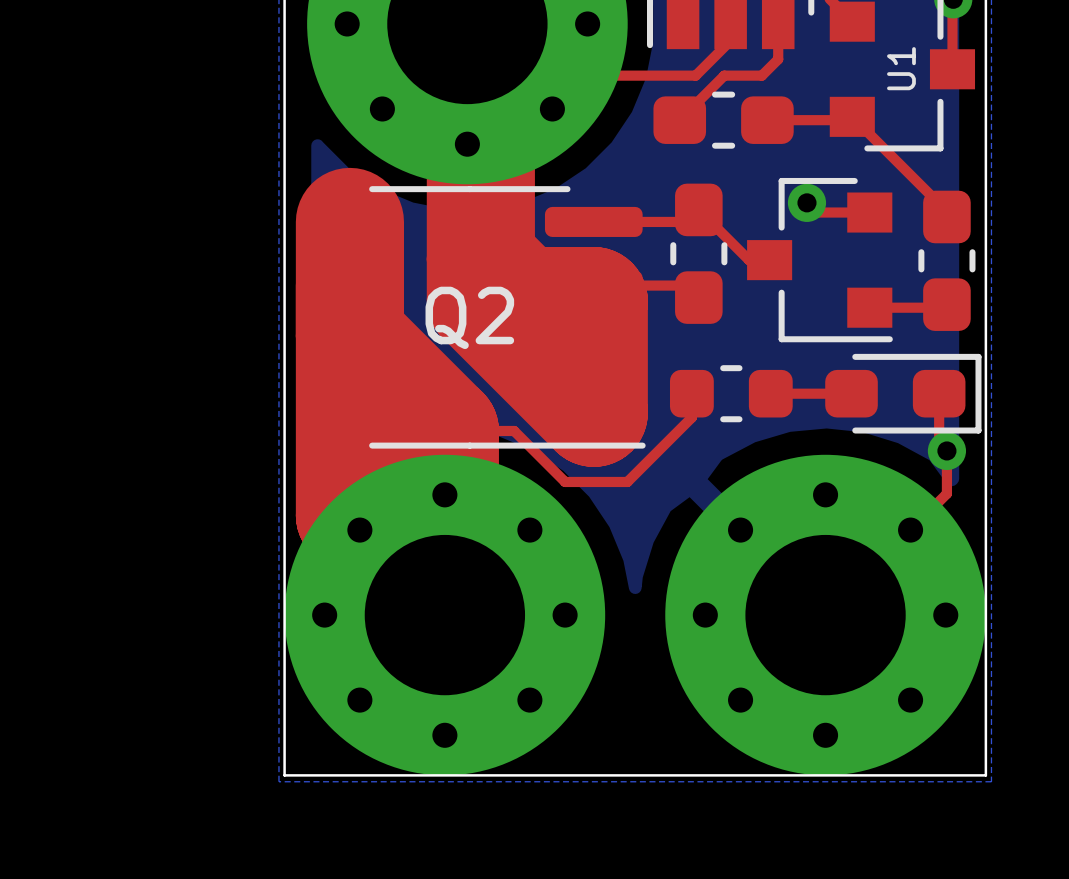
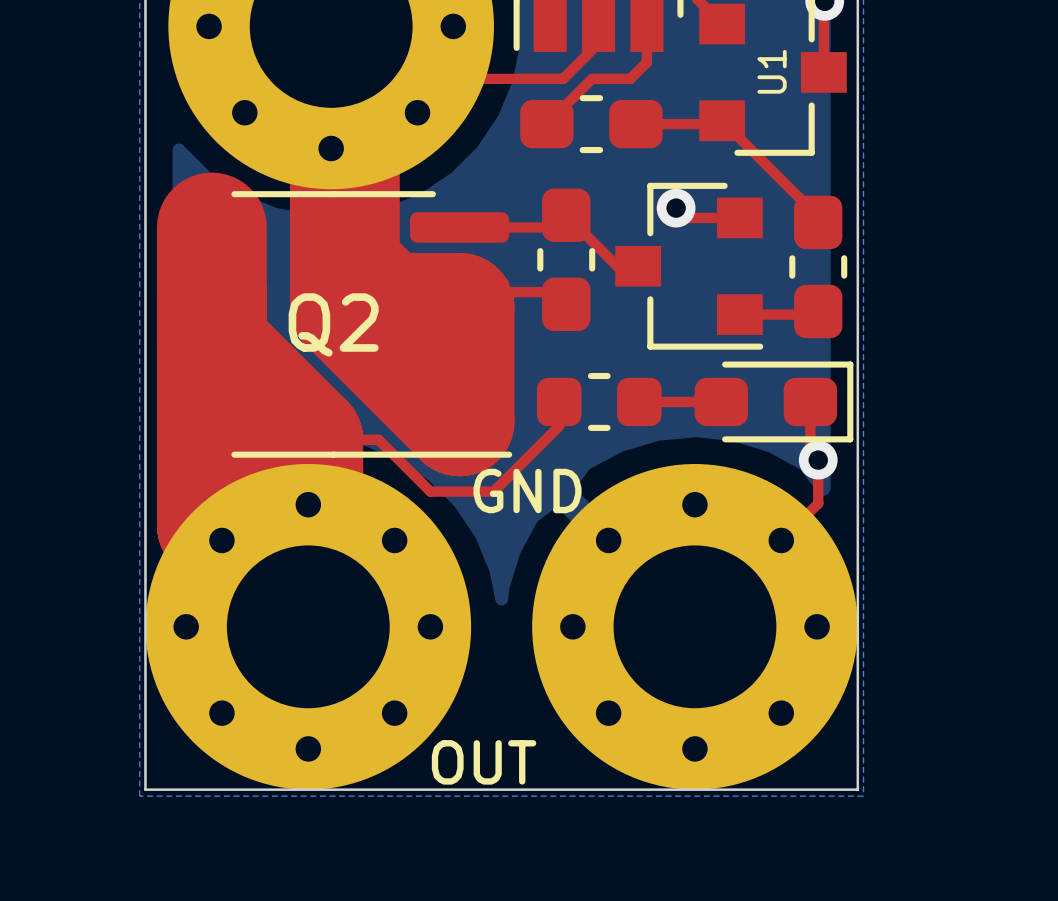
text: none -> GND (527, 490)
text: none -> OUT (484, 762)

